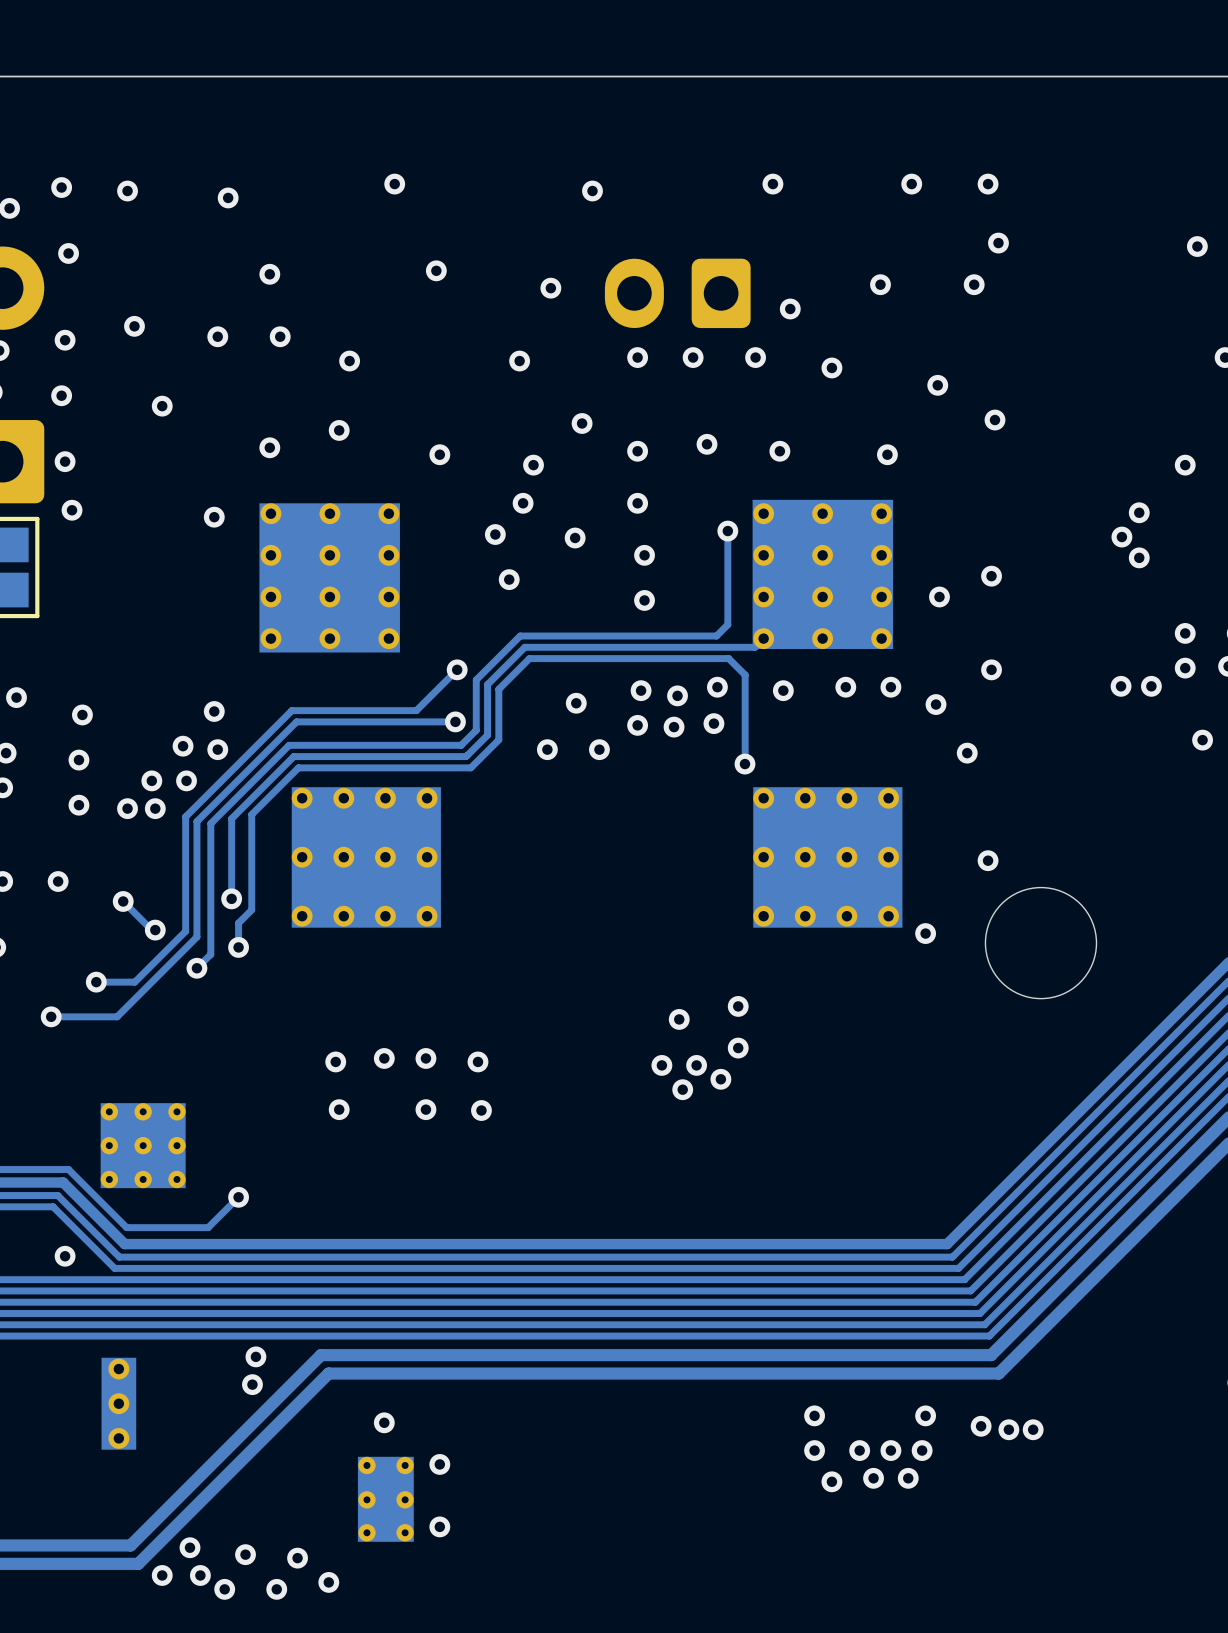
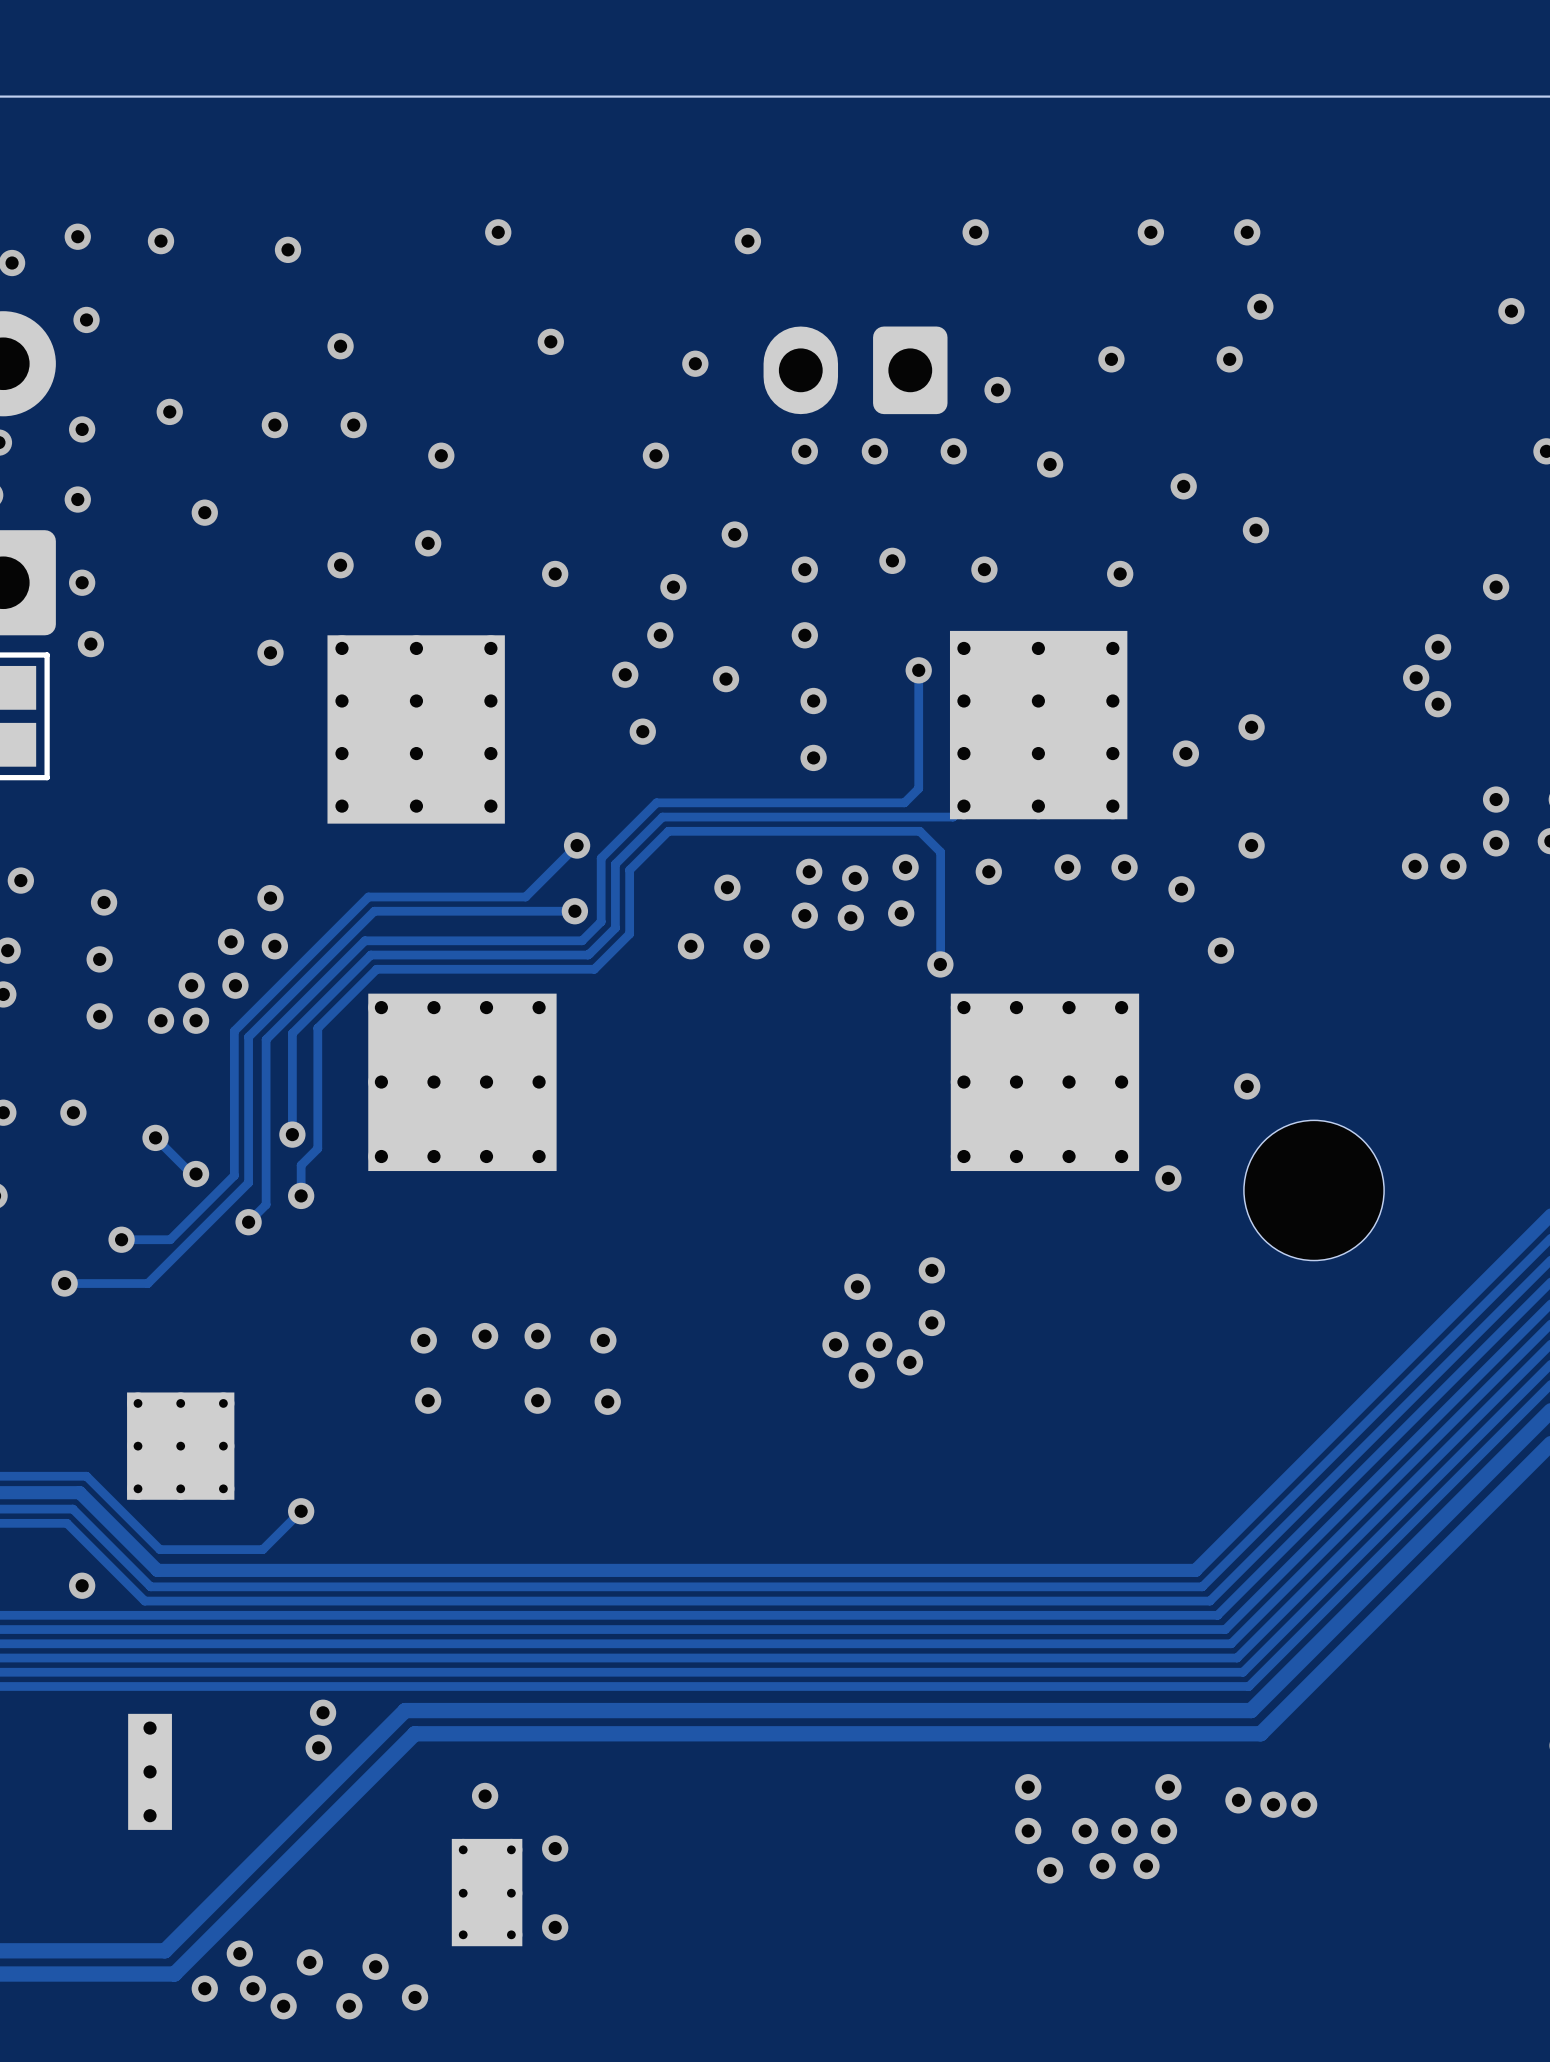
via: (1202, 740) -> none

